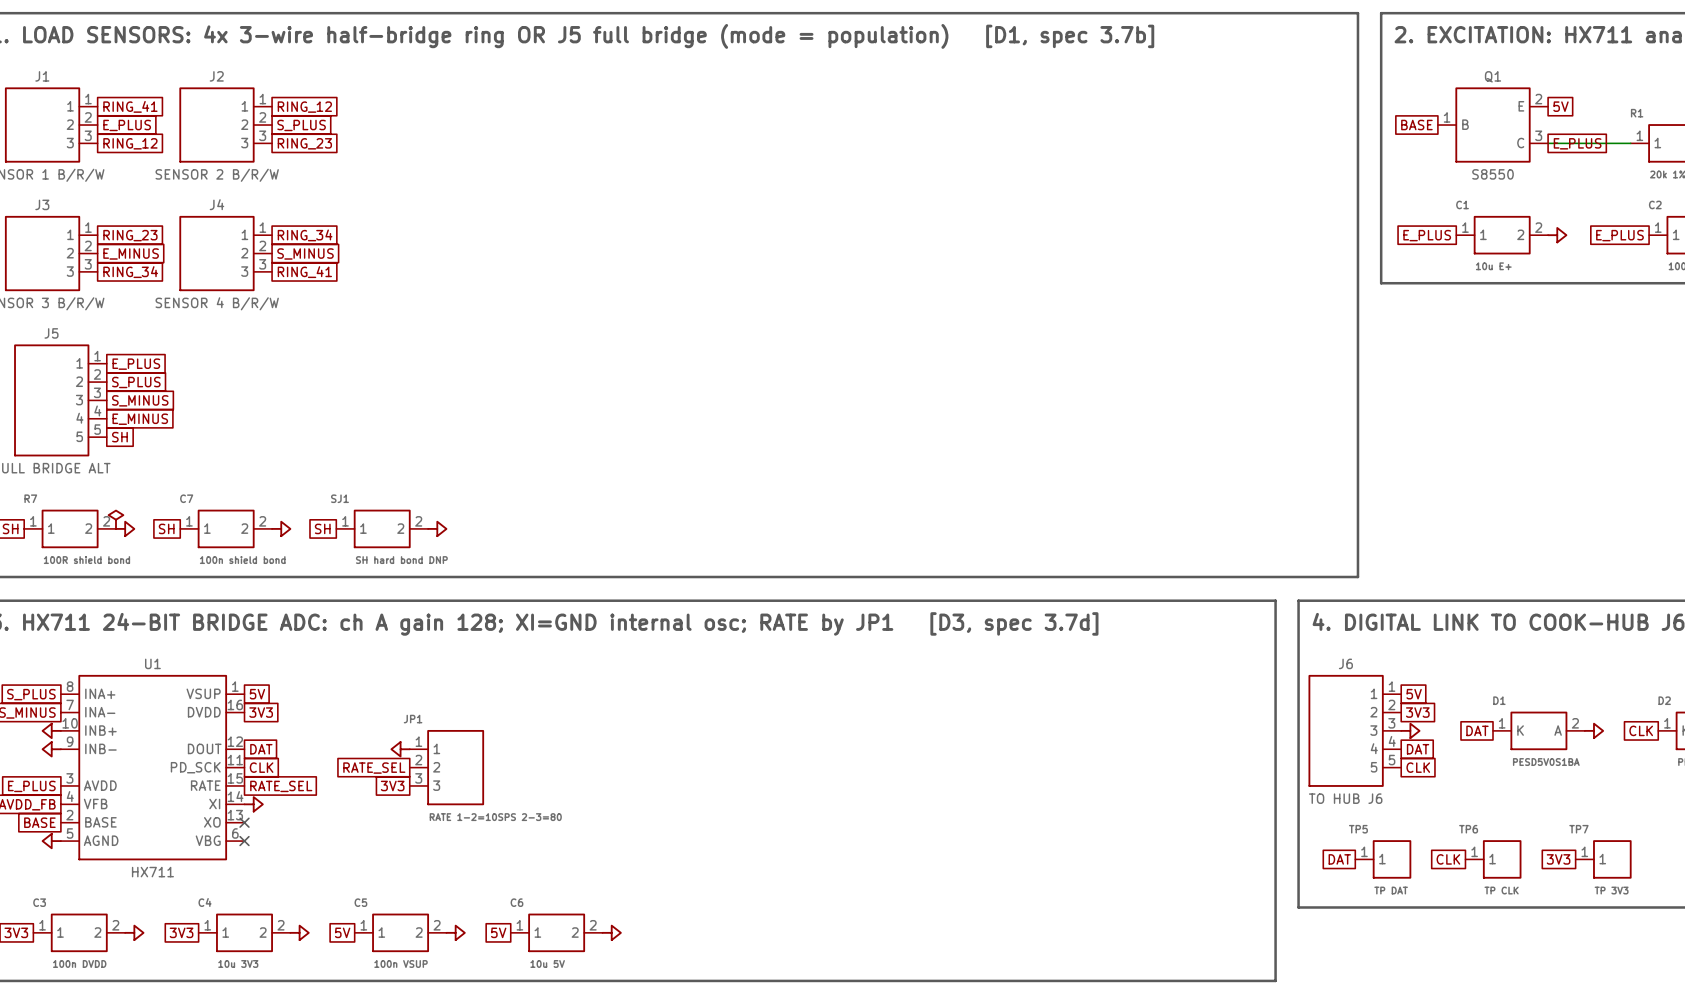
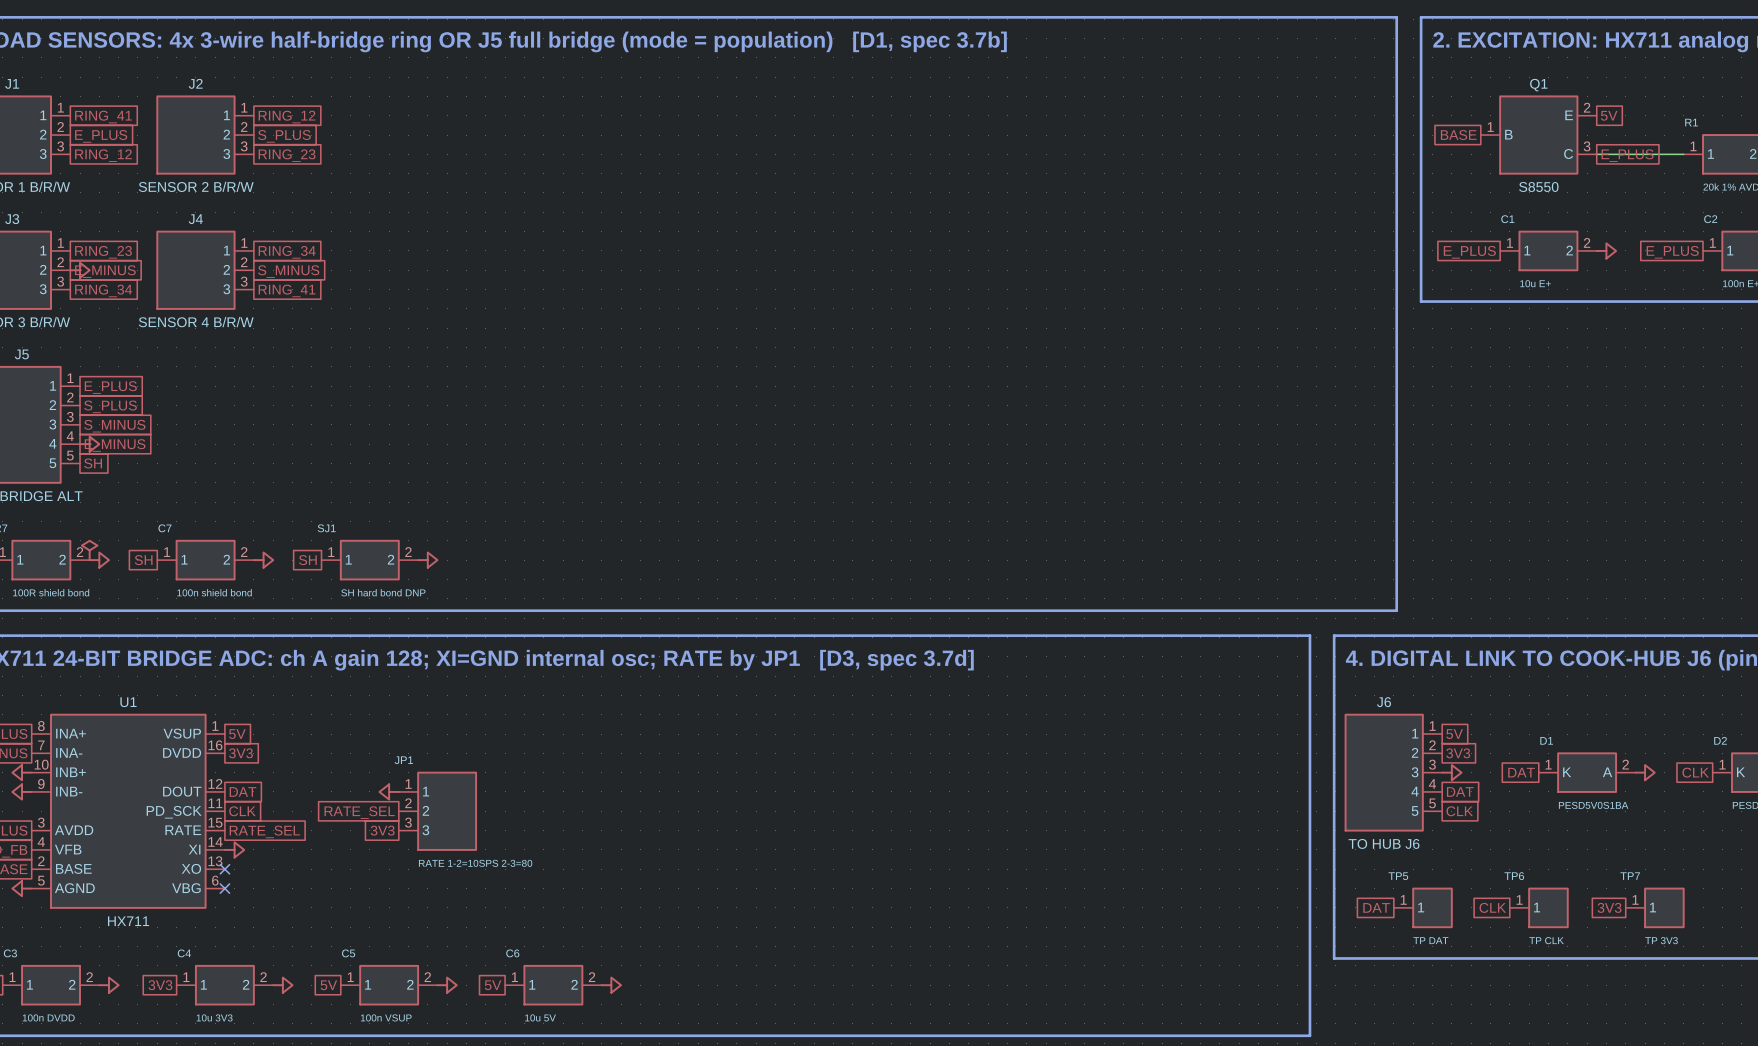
power symbol: none -> (80, 270)
power symbol: none -> (89, 444)

